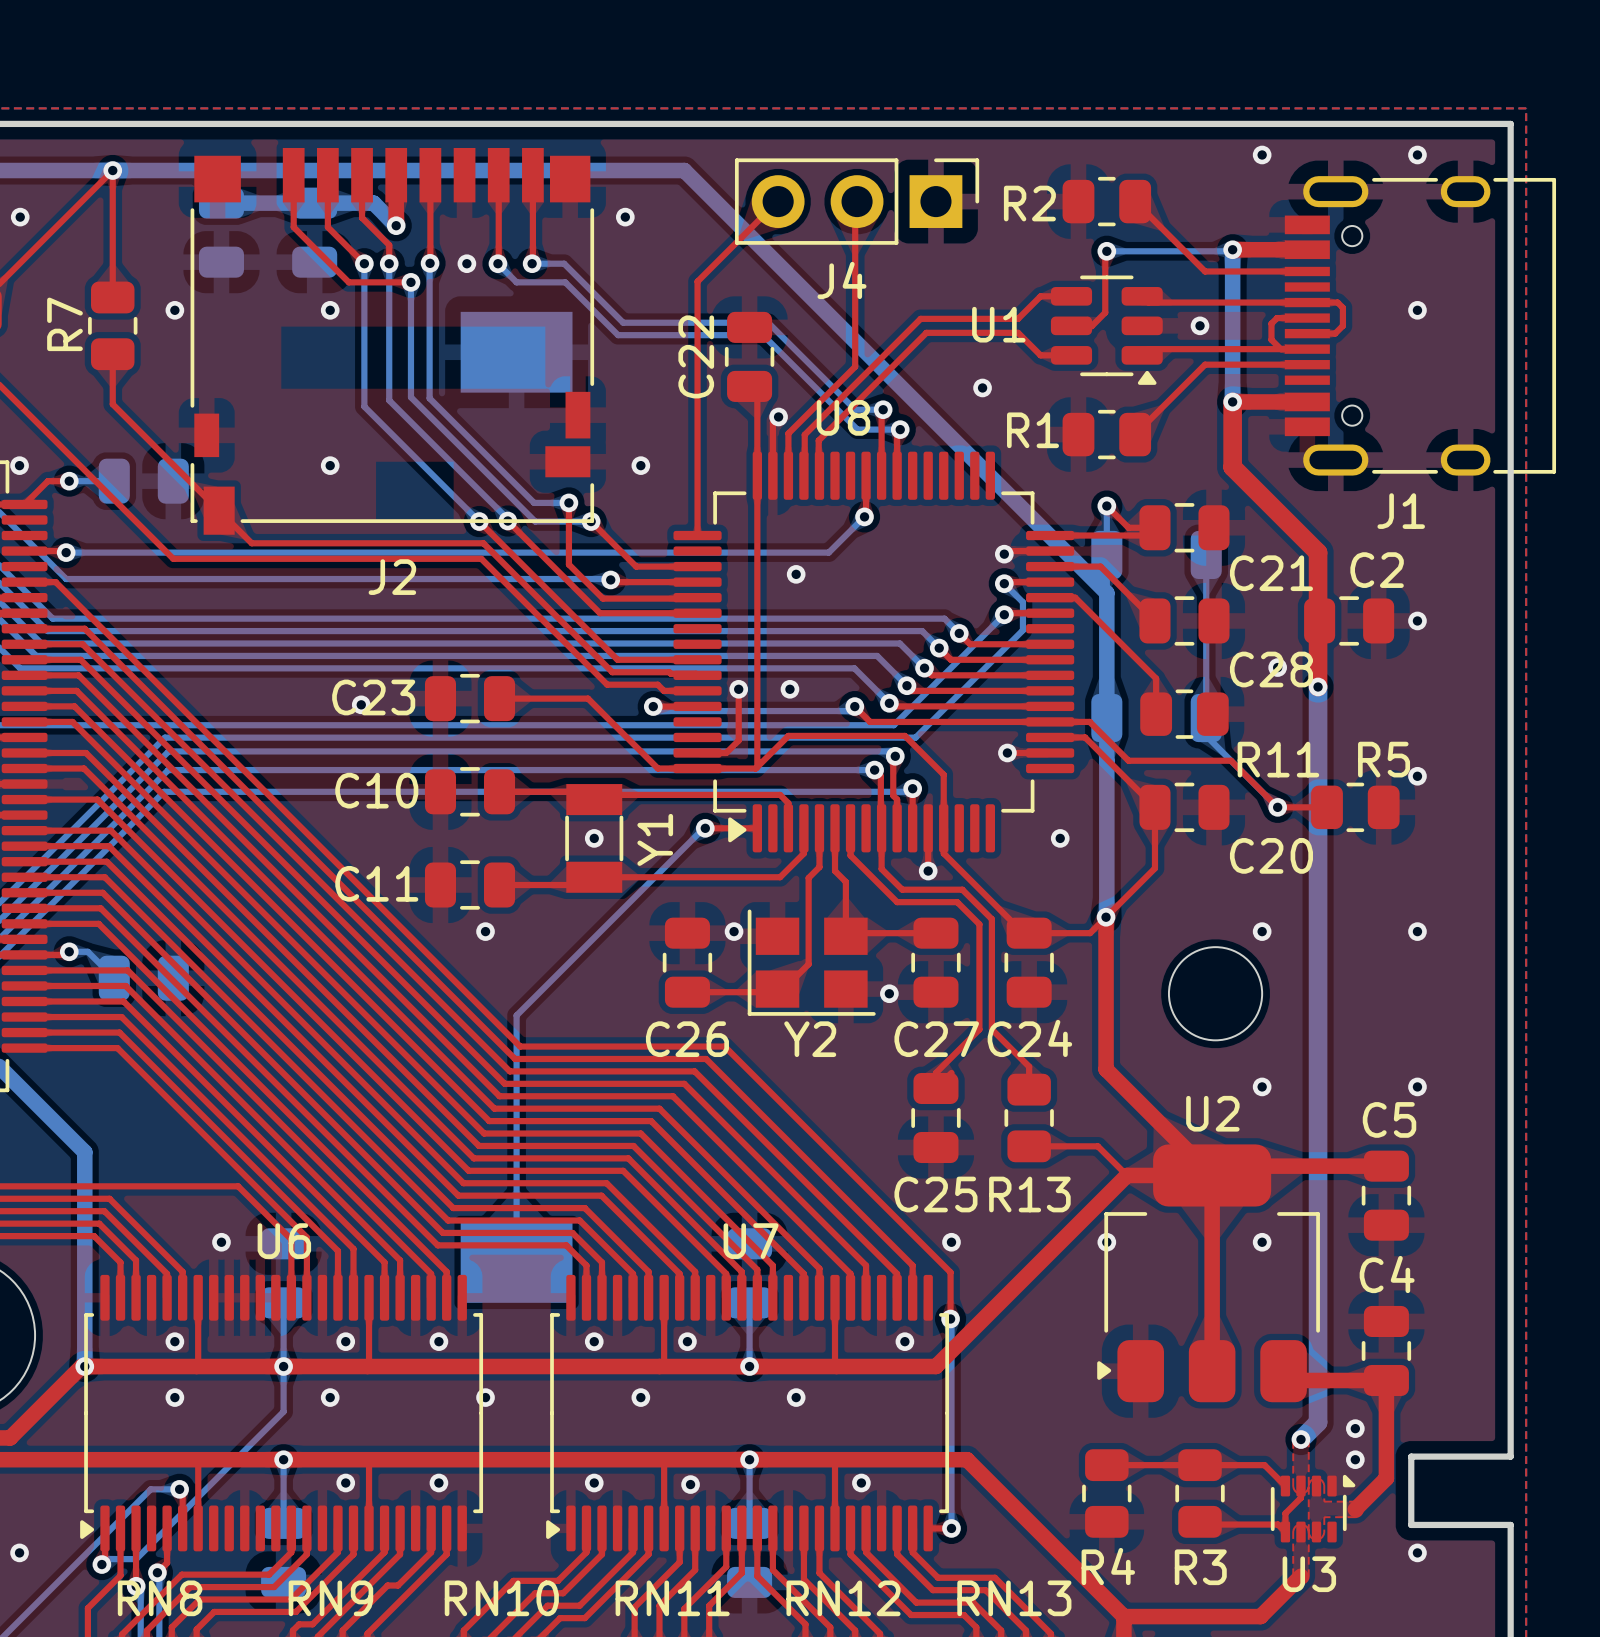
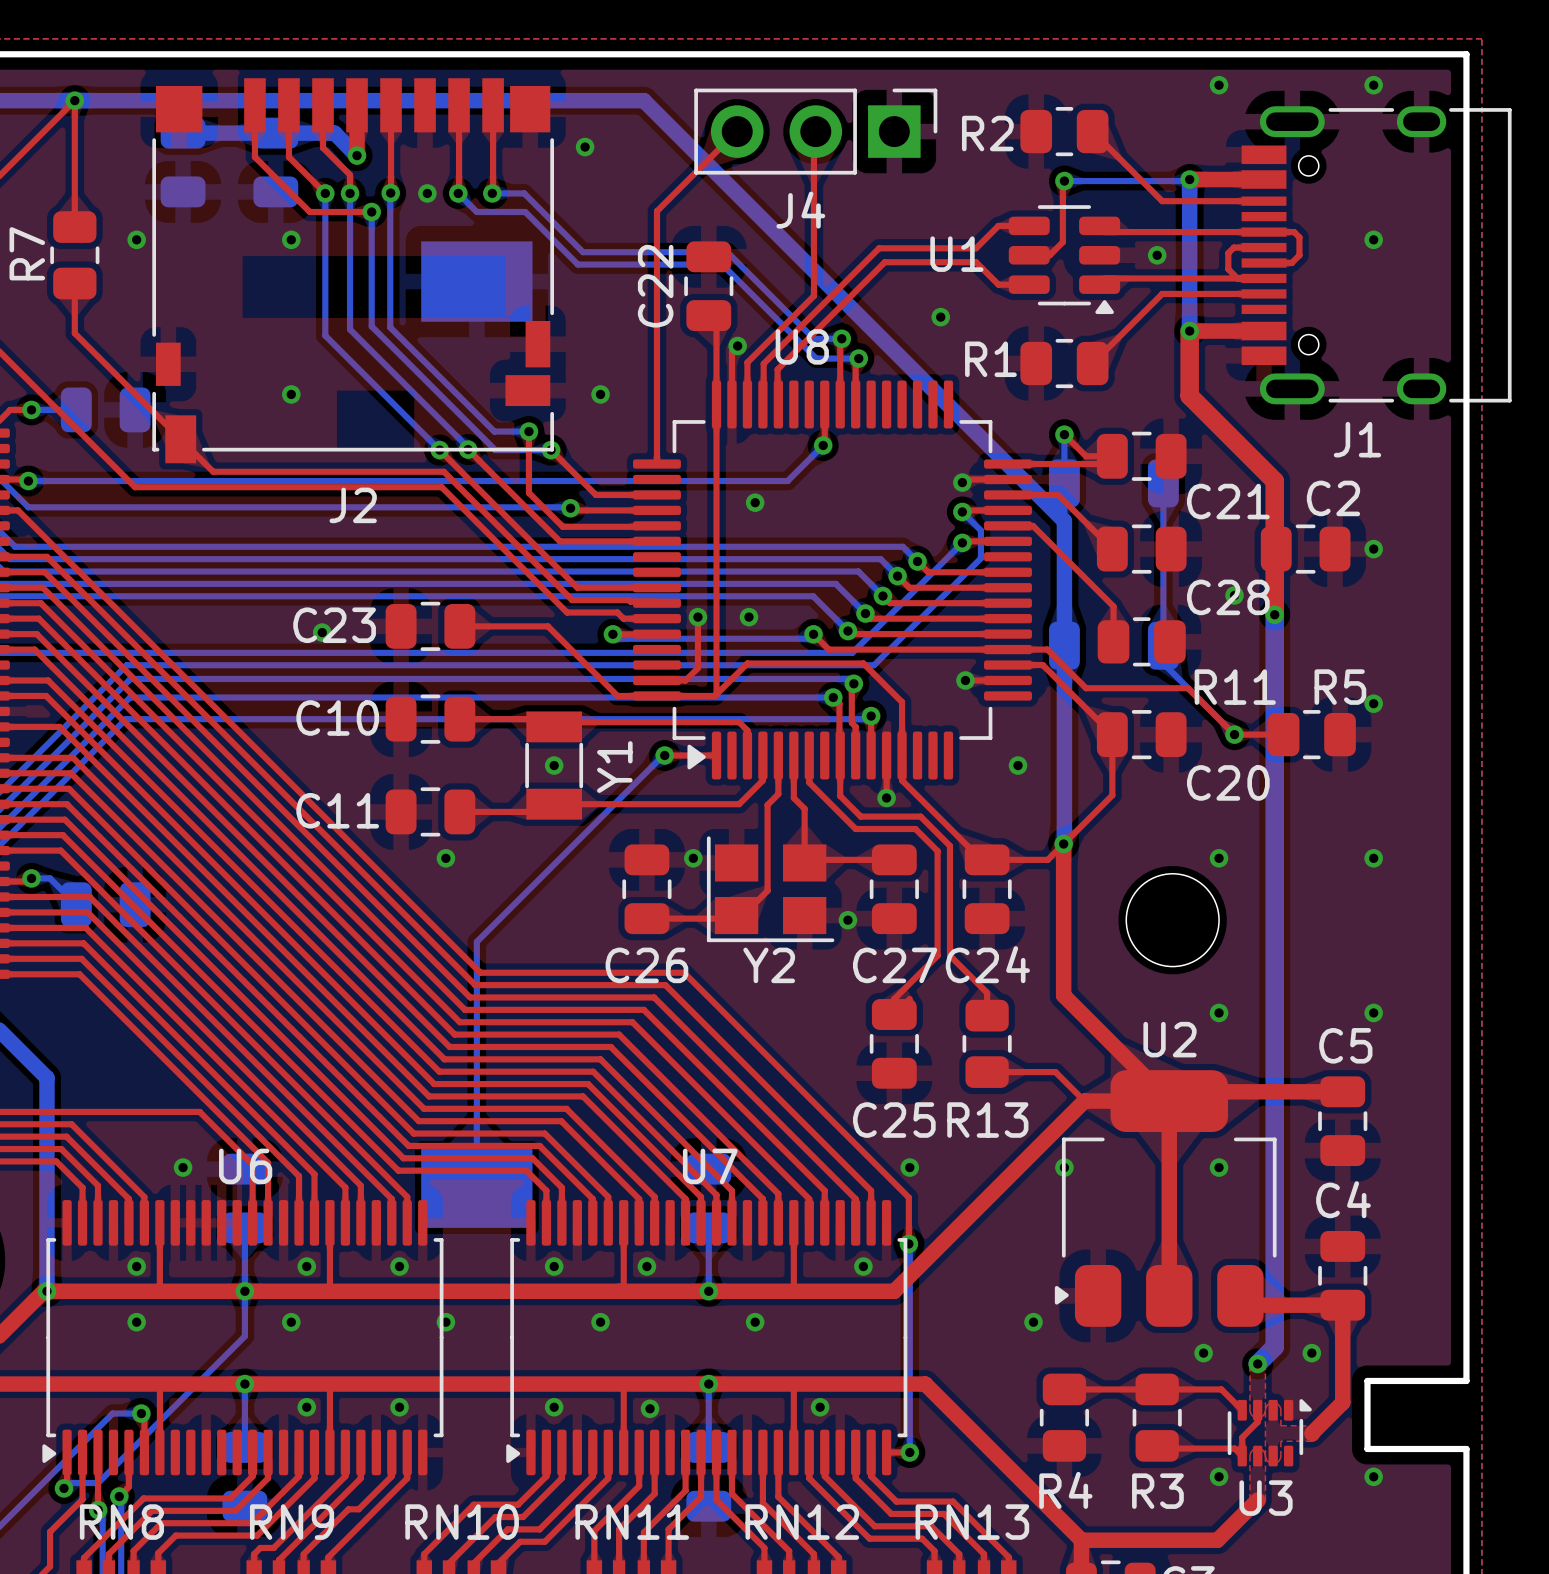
via: none -> (1033, 1322)
via: none -> (1203, 1353)
via: (1355, 1459) -> none
via: none -> (1219, 1476)

